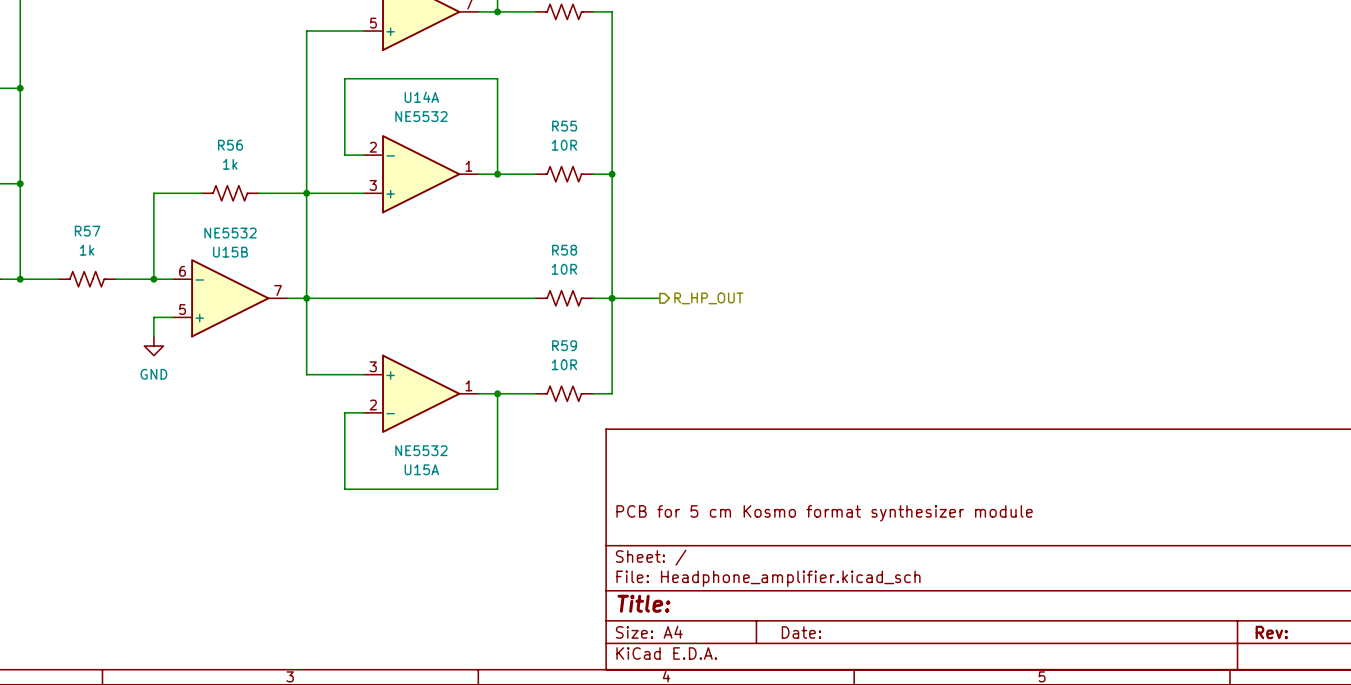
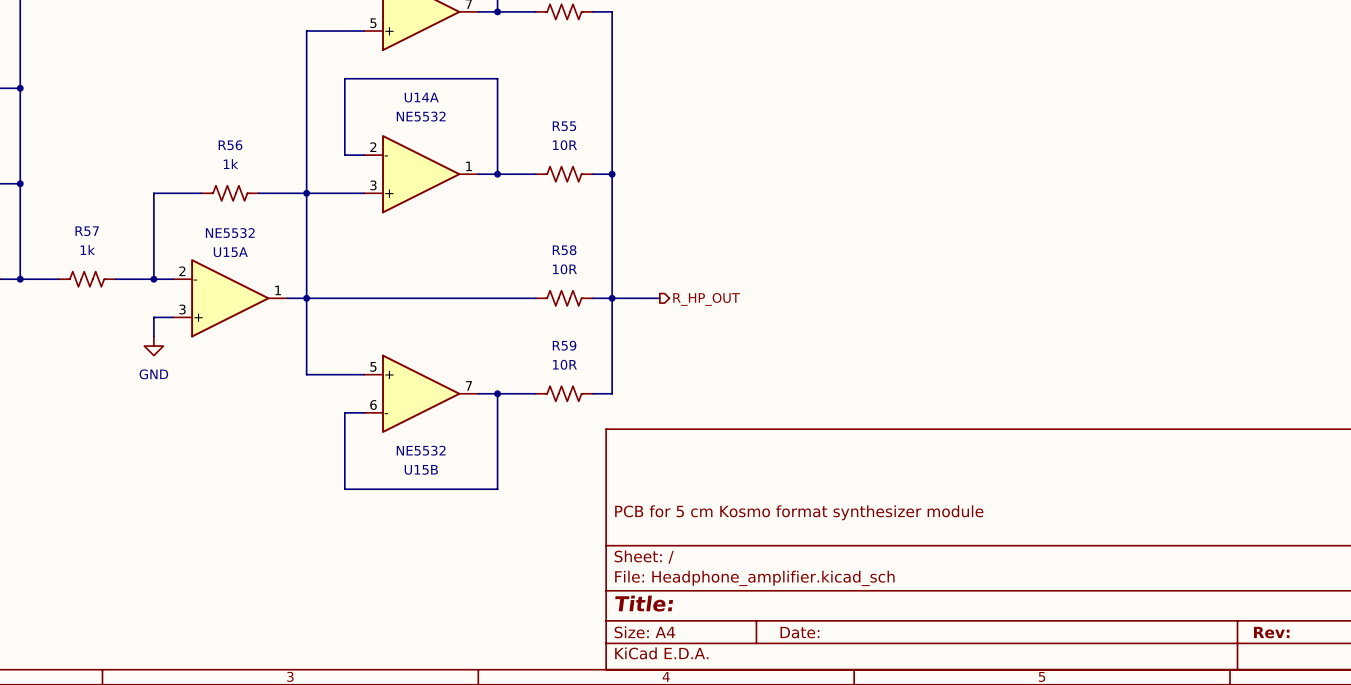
U15B name position: U15B (230, 252) -> U15B (421, 469)
U15B flip: as is (230, 298) -> up-down (421, 393)
U15B position: (230, 298) -> (421, 393)
U15A flip: as is (421, 393) -> up-down (230, 298)
U15A position: (421, 393) -> (230, 298)
U15A name position: U15A (421, 469) -> U15A (230, 252)

